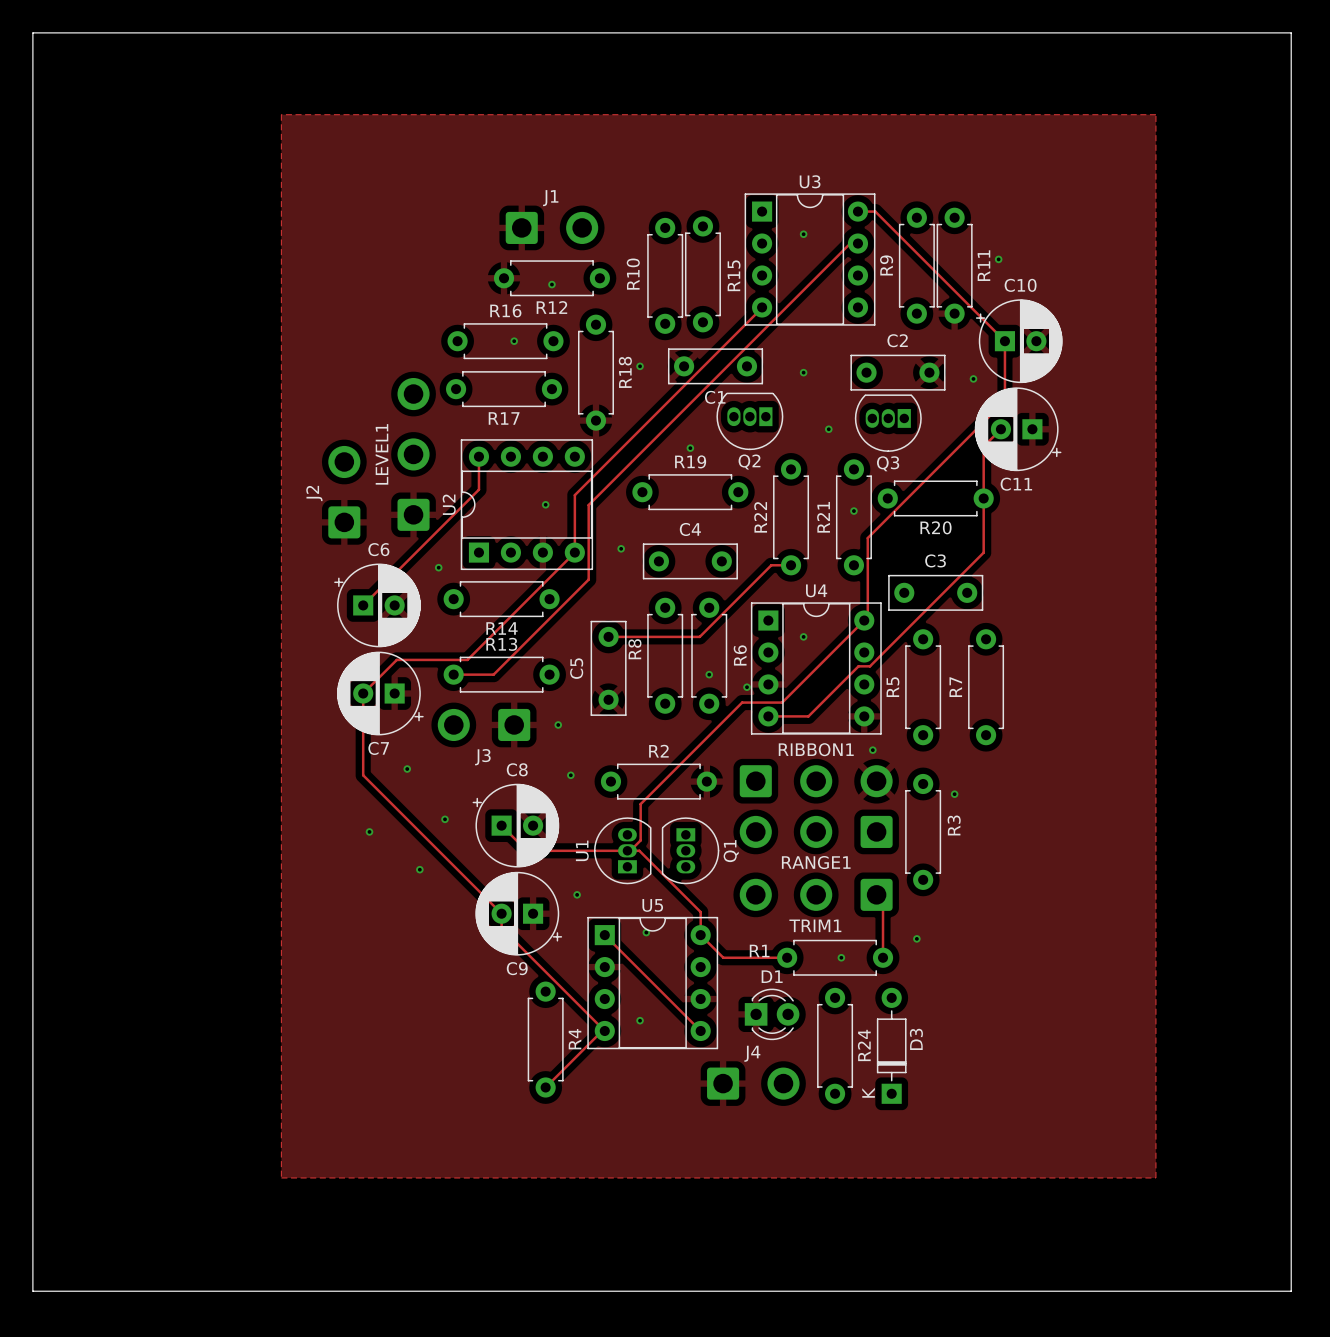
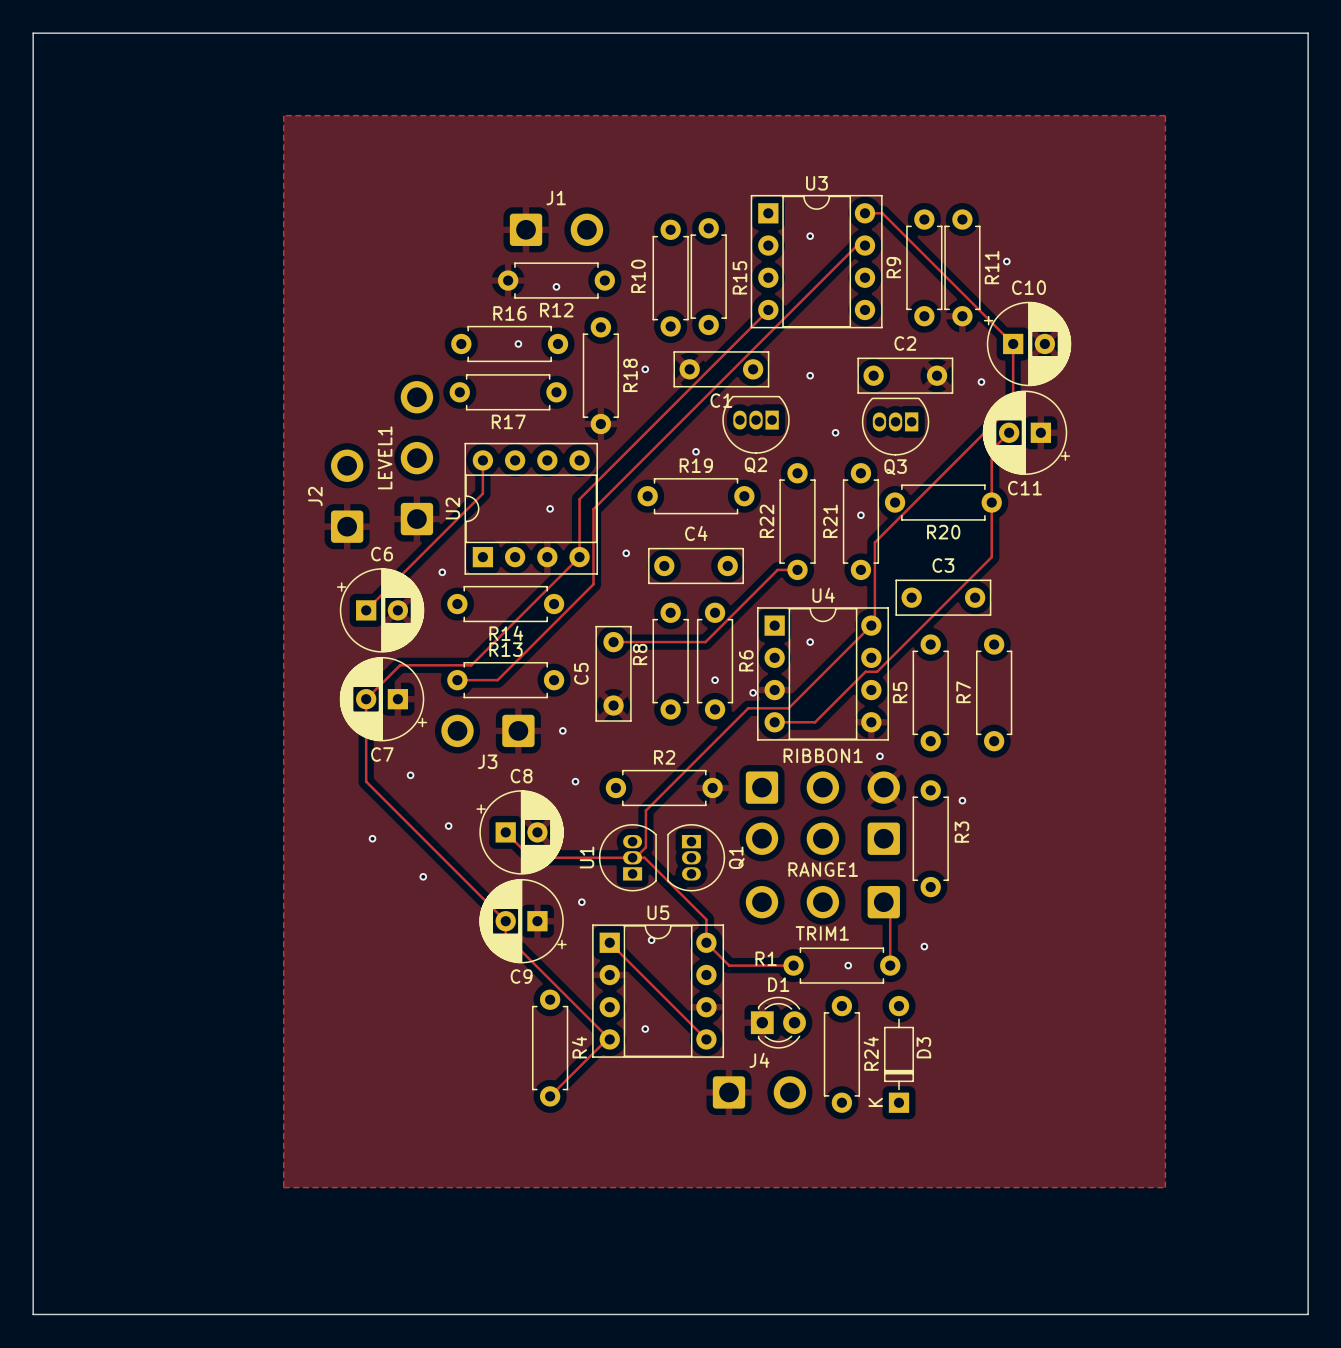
board edge: (1291, 32) (1291, 1291) (32, 1291) -> (1301, 33) (1308, 33) (1308, 1314) (33, 1314) (33, 1301)

